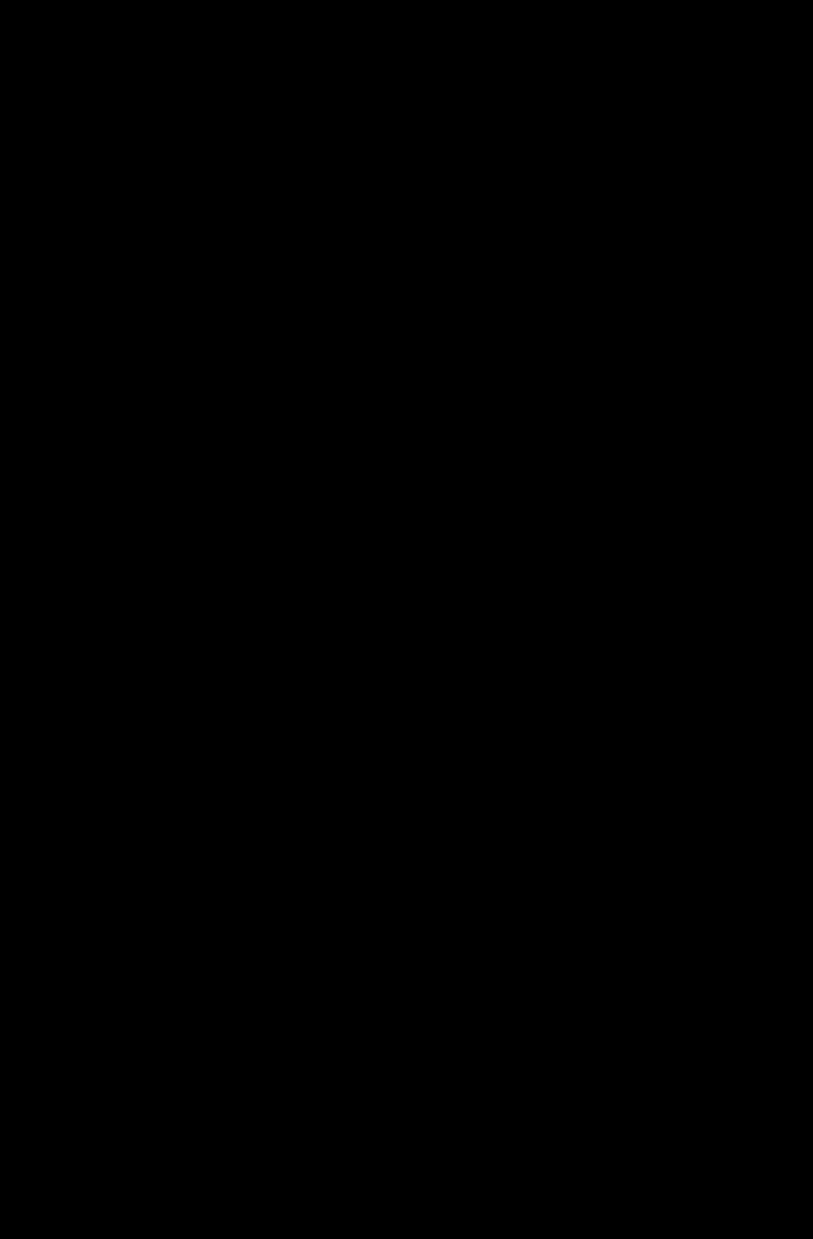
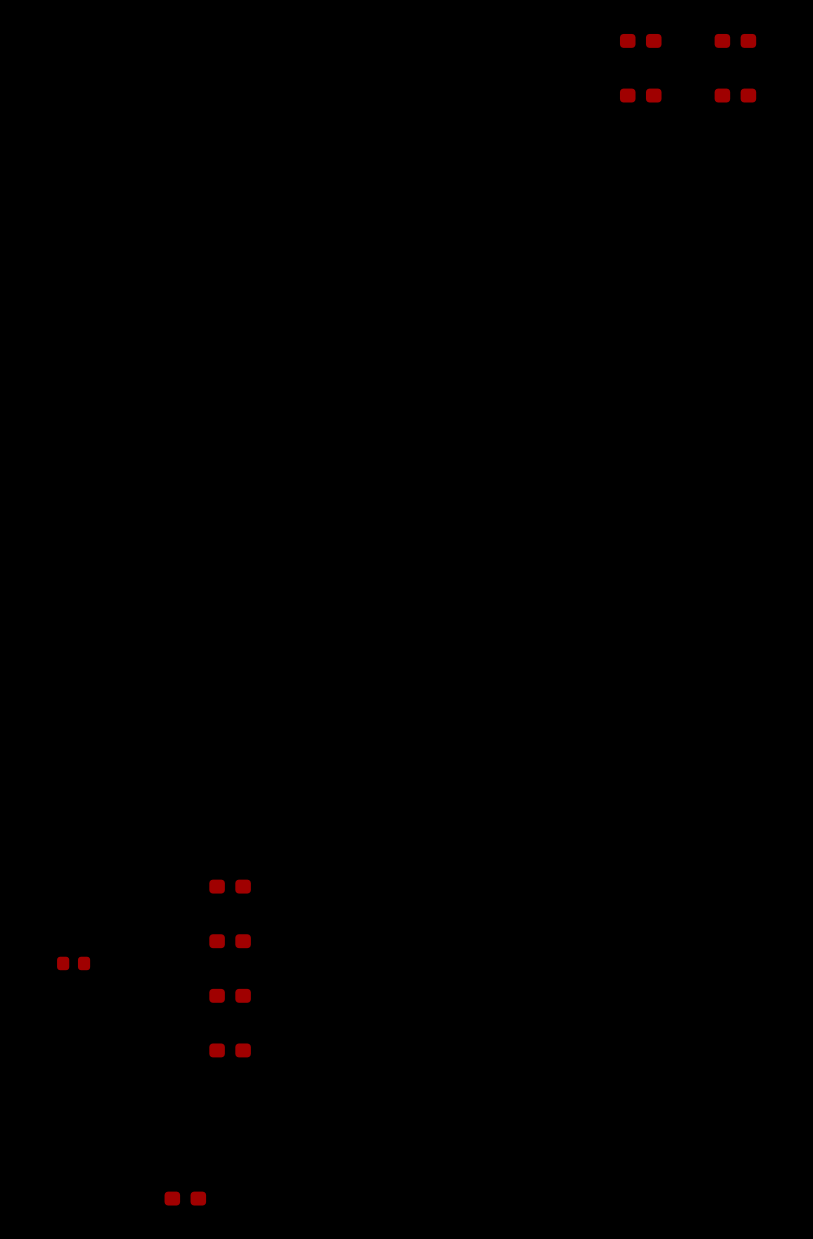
part: none -> (640, 40)
part: none -> (735, 40)
part: none -> (640, 95)
part: none -> (735, 95)
part: none -> (230, 886)
part: none -> (230, 941)
part: none -> (73, 963)
part: none -> (230, 995)
part: none -> (230, 1050)
part: none -> (185, 1198)

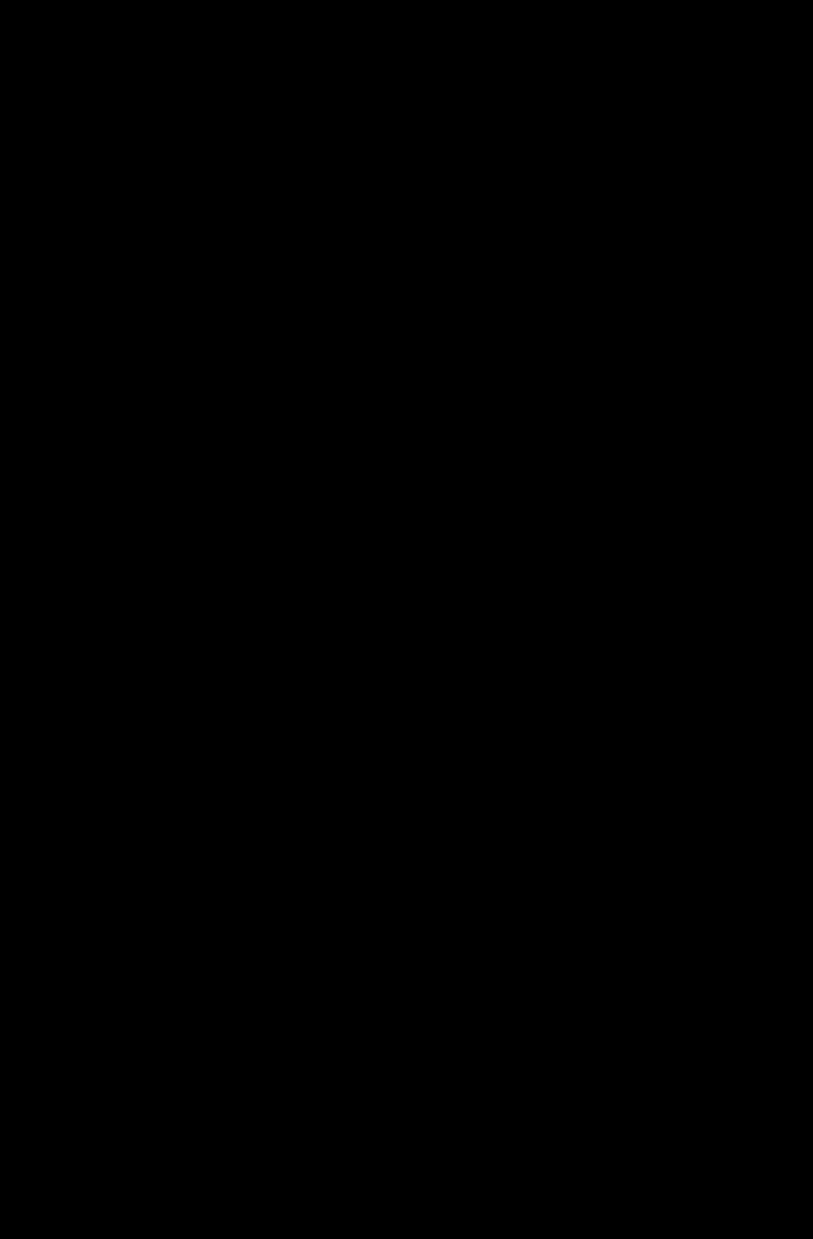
part: (640, 40) -> none
part: (735, 40) -> none
part: (640, 95) -> none
part: (735, 95) -> none
part: (230, 886) -> none
part: (230, 941) -> none
part: (73, 963) -> none
part: (230, 995) -> none
part: (230, 1050) -> none
part: (185, 1198) -> none

